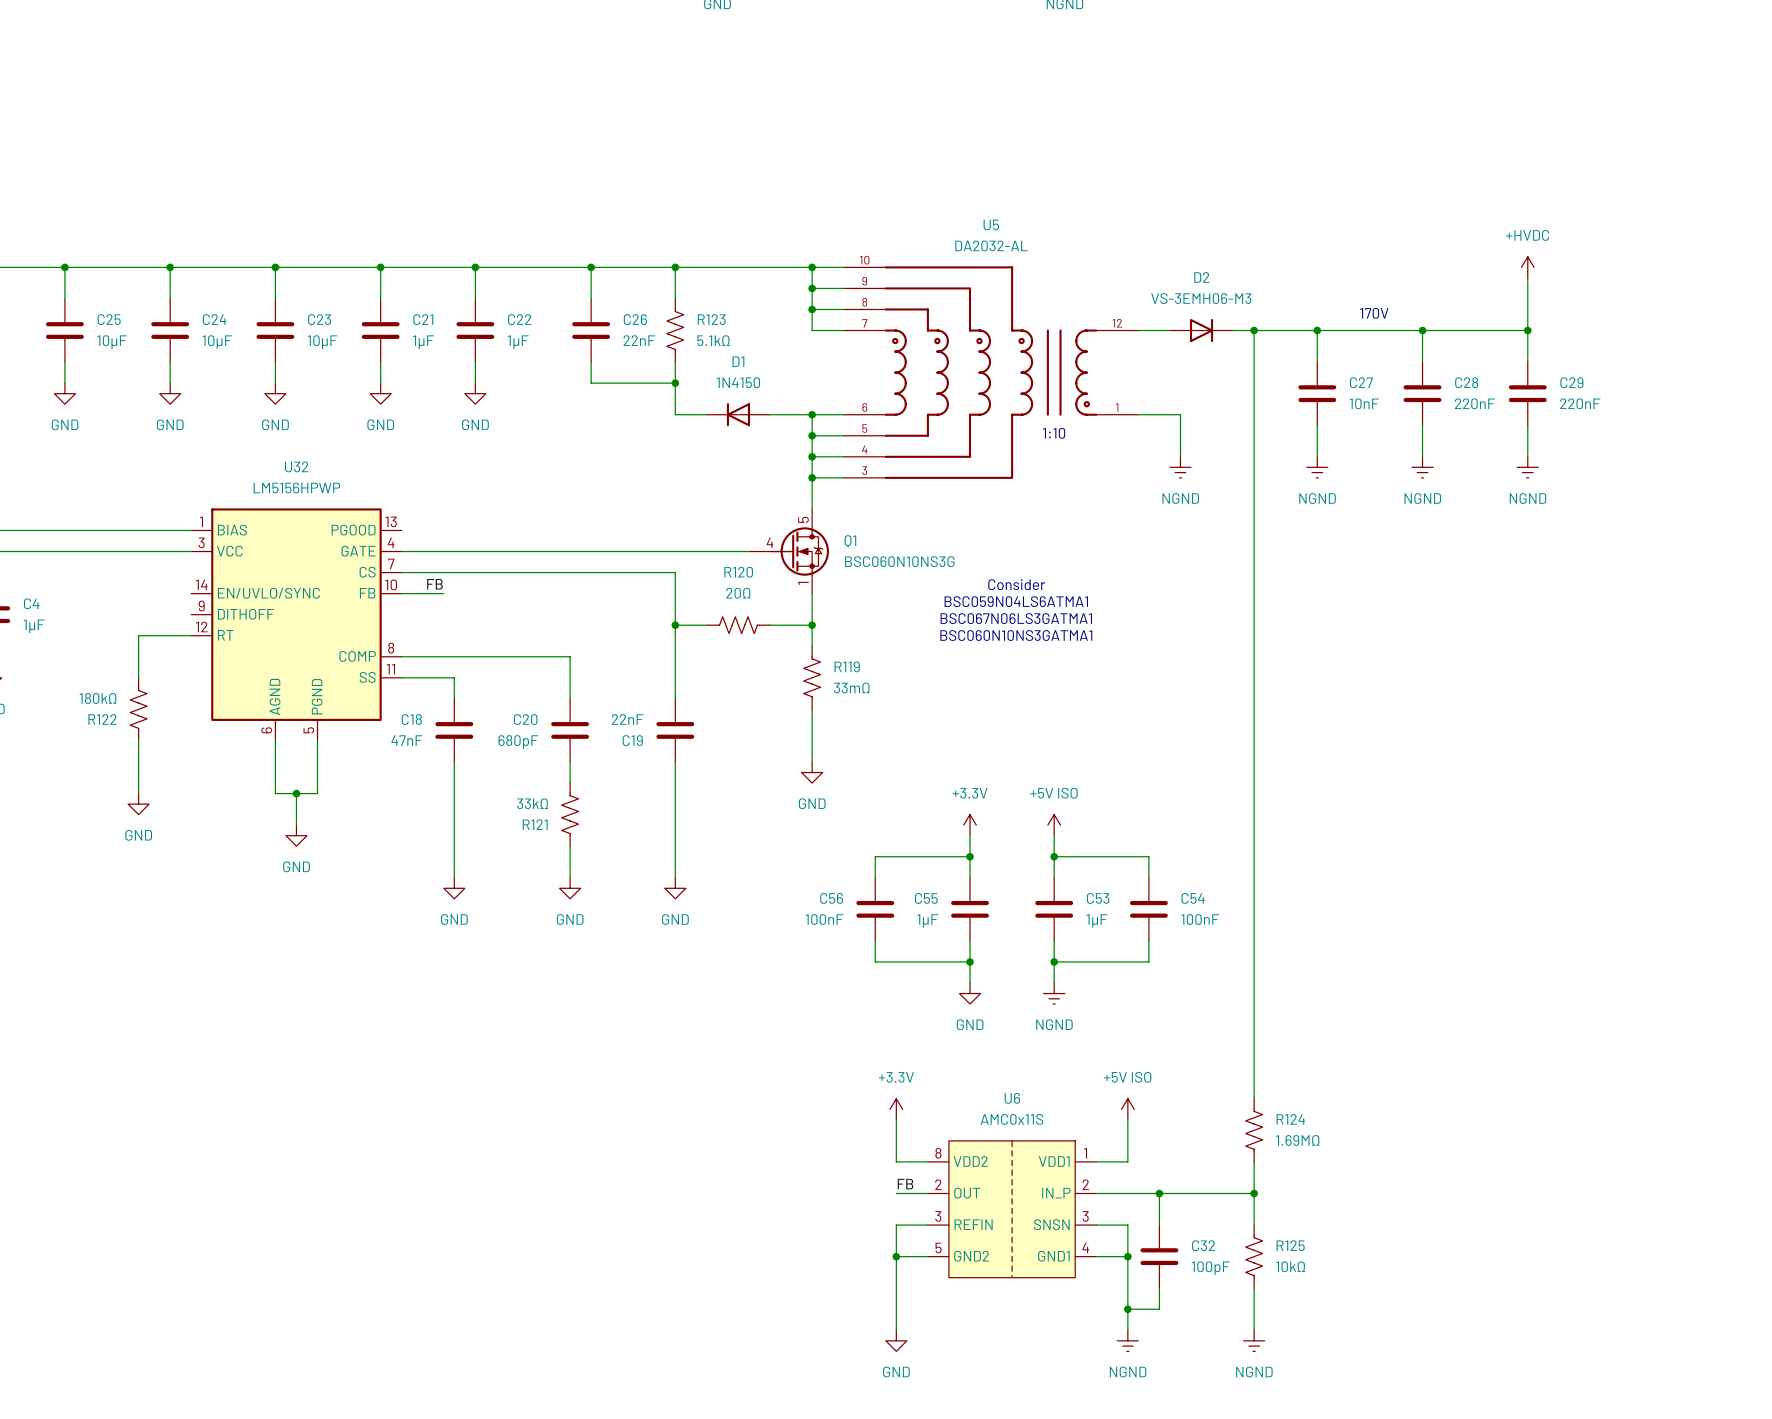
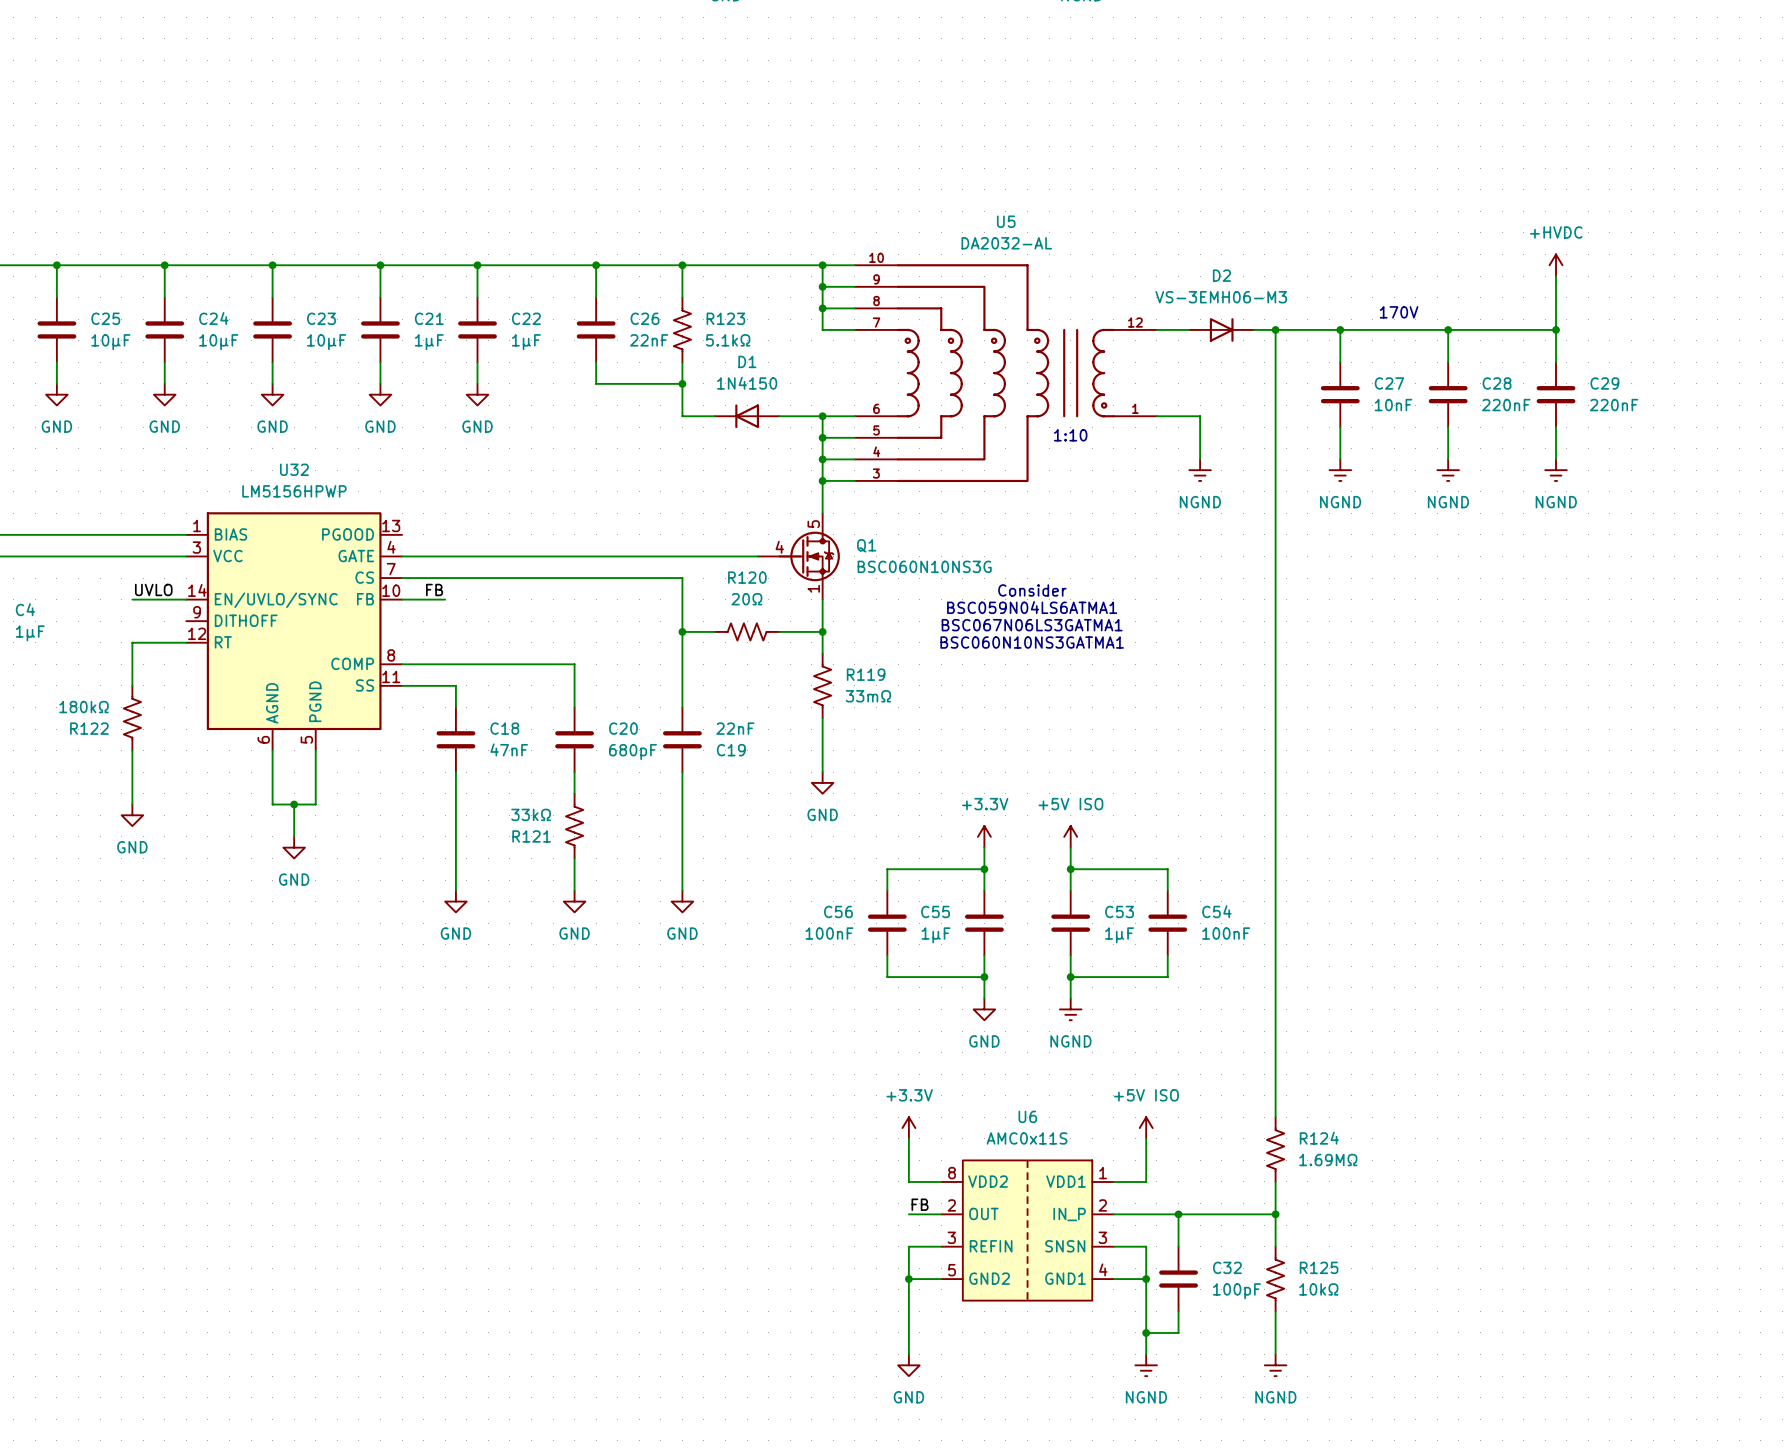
label: none -> UVLO (153, 589)
wire: none -> (132, 599) (186, 599)
C18 name position: C18 (411, 719) -> C18 (504, 728)
C20 name position: C20 (525, 719) -> C20 (623, 728)
C19 value position: 22nF (627, 719) -> 22nF (735, 728)
C18 value position: 47nF (406, 740) -> 47nF (509, 749)
C19 name position: C19 (632, 740) -> C19 (731, 750)
C20 value position: 680pF (518, 741) -> 680pF (632, 751)

